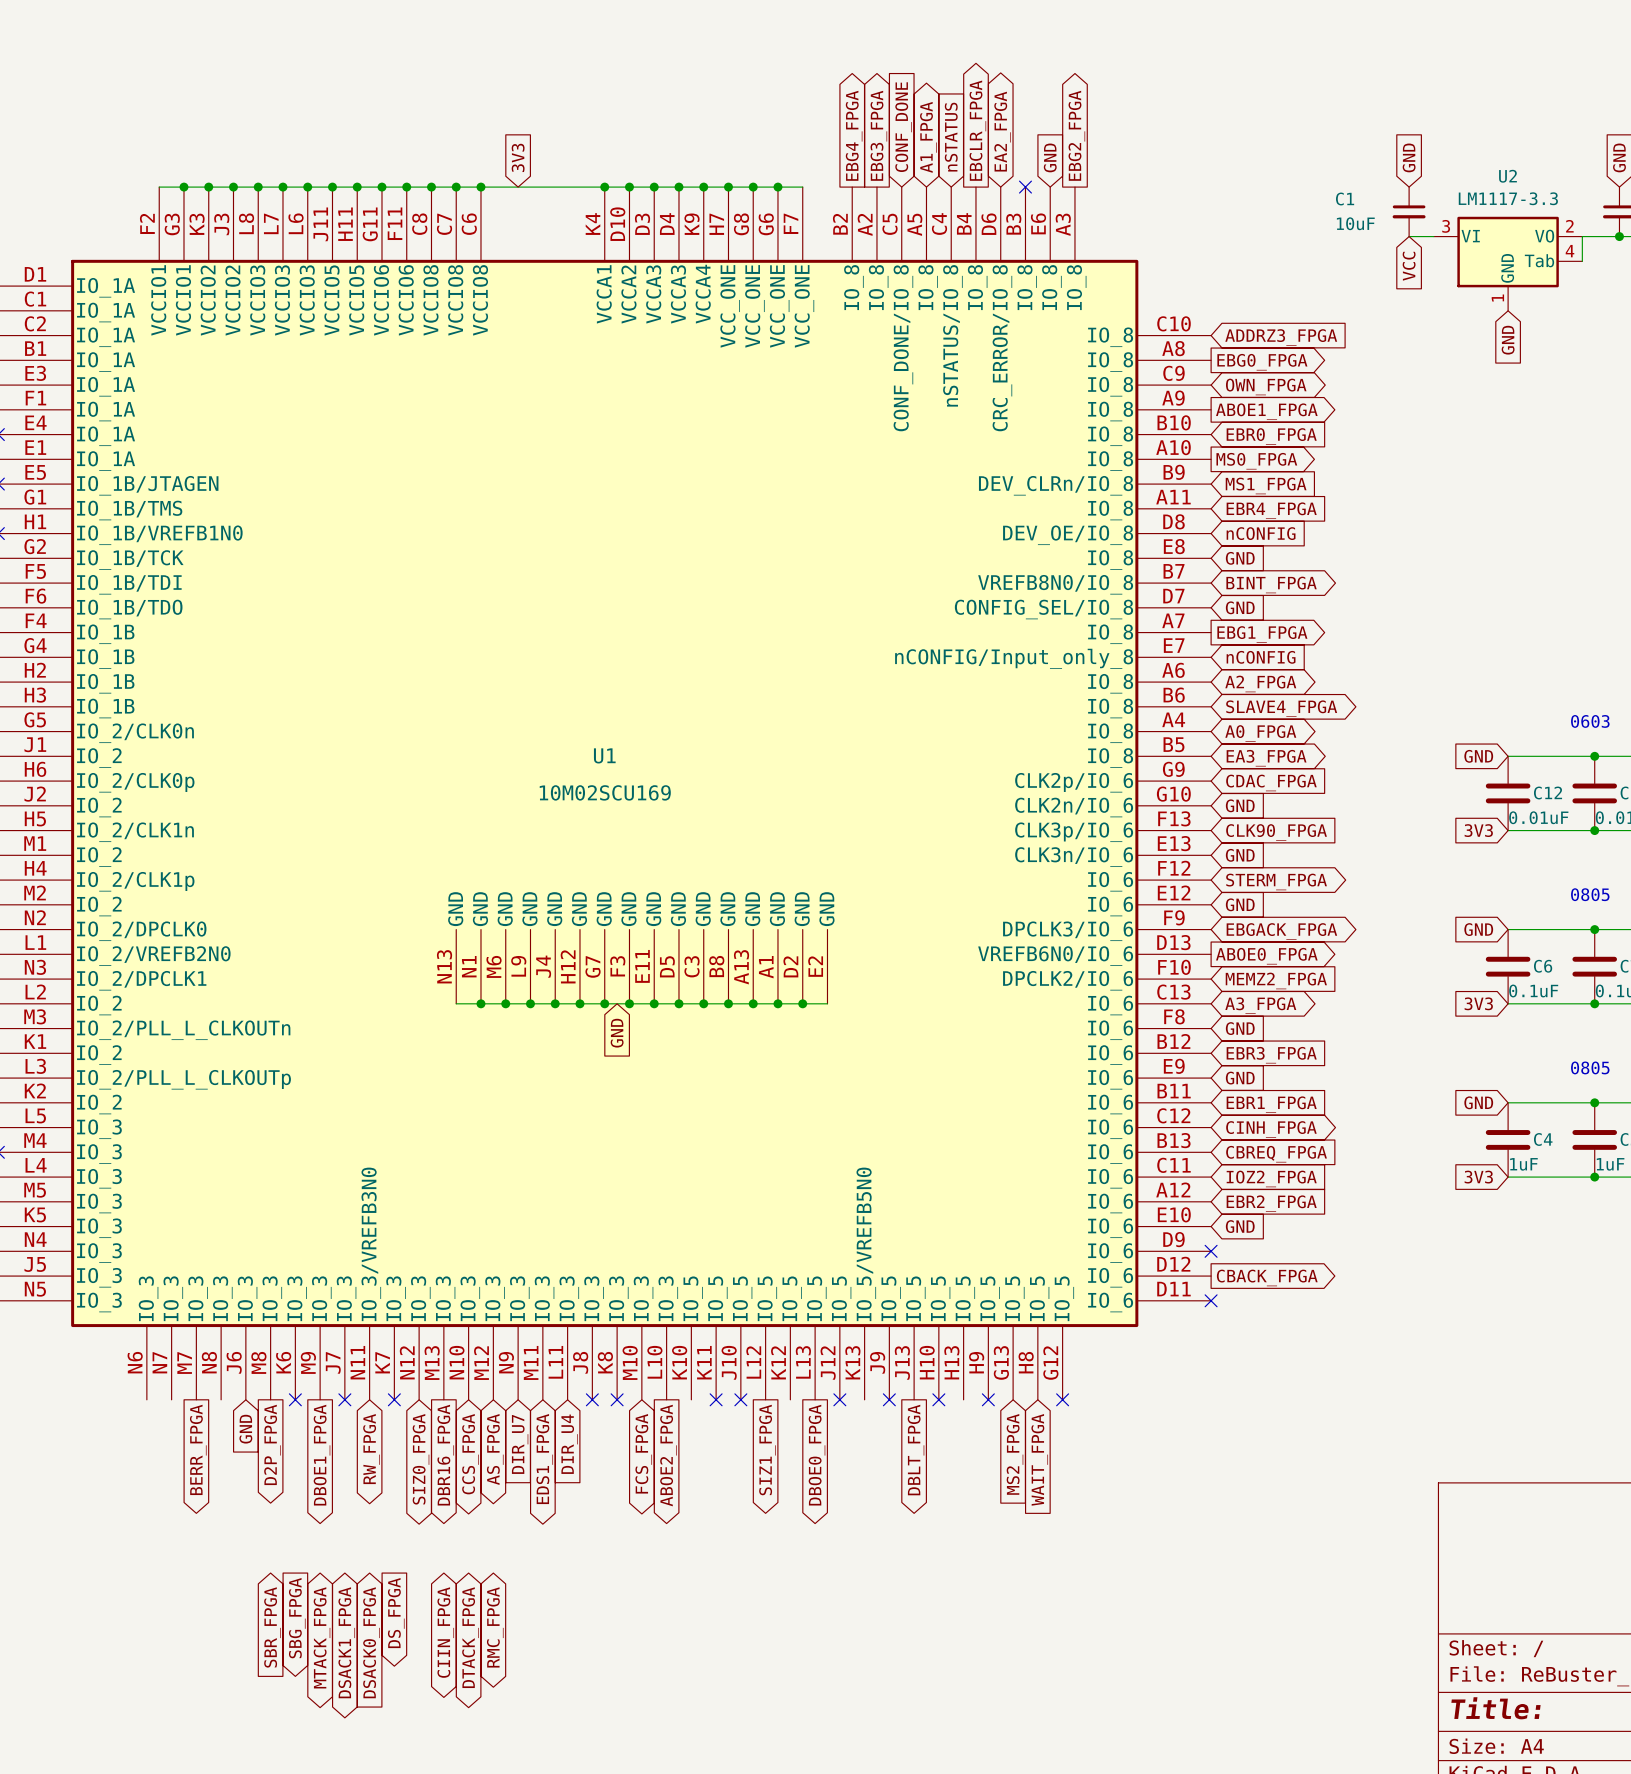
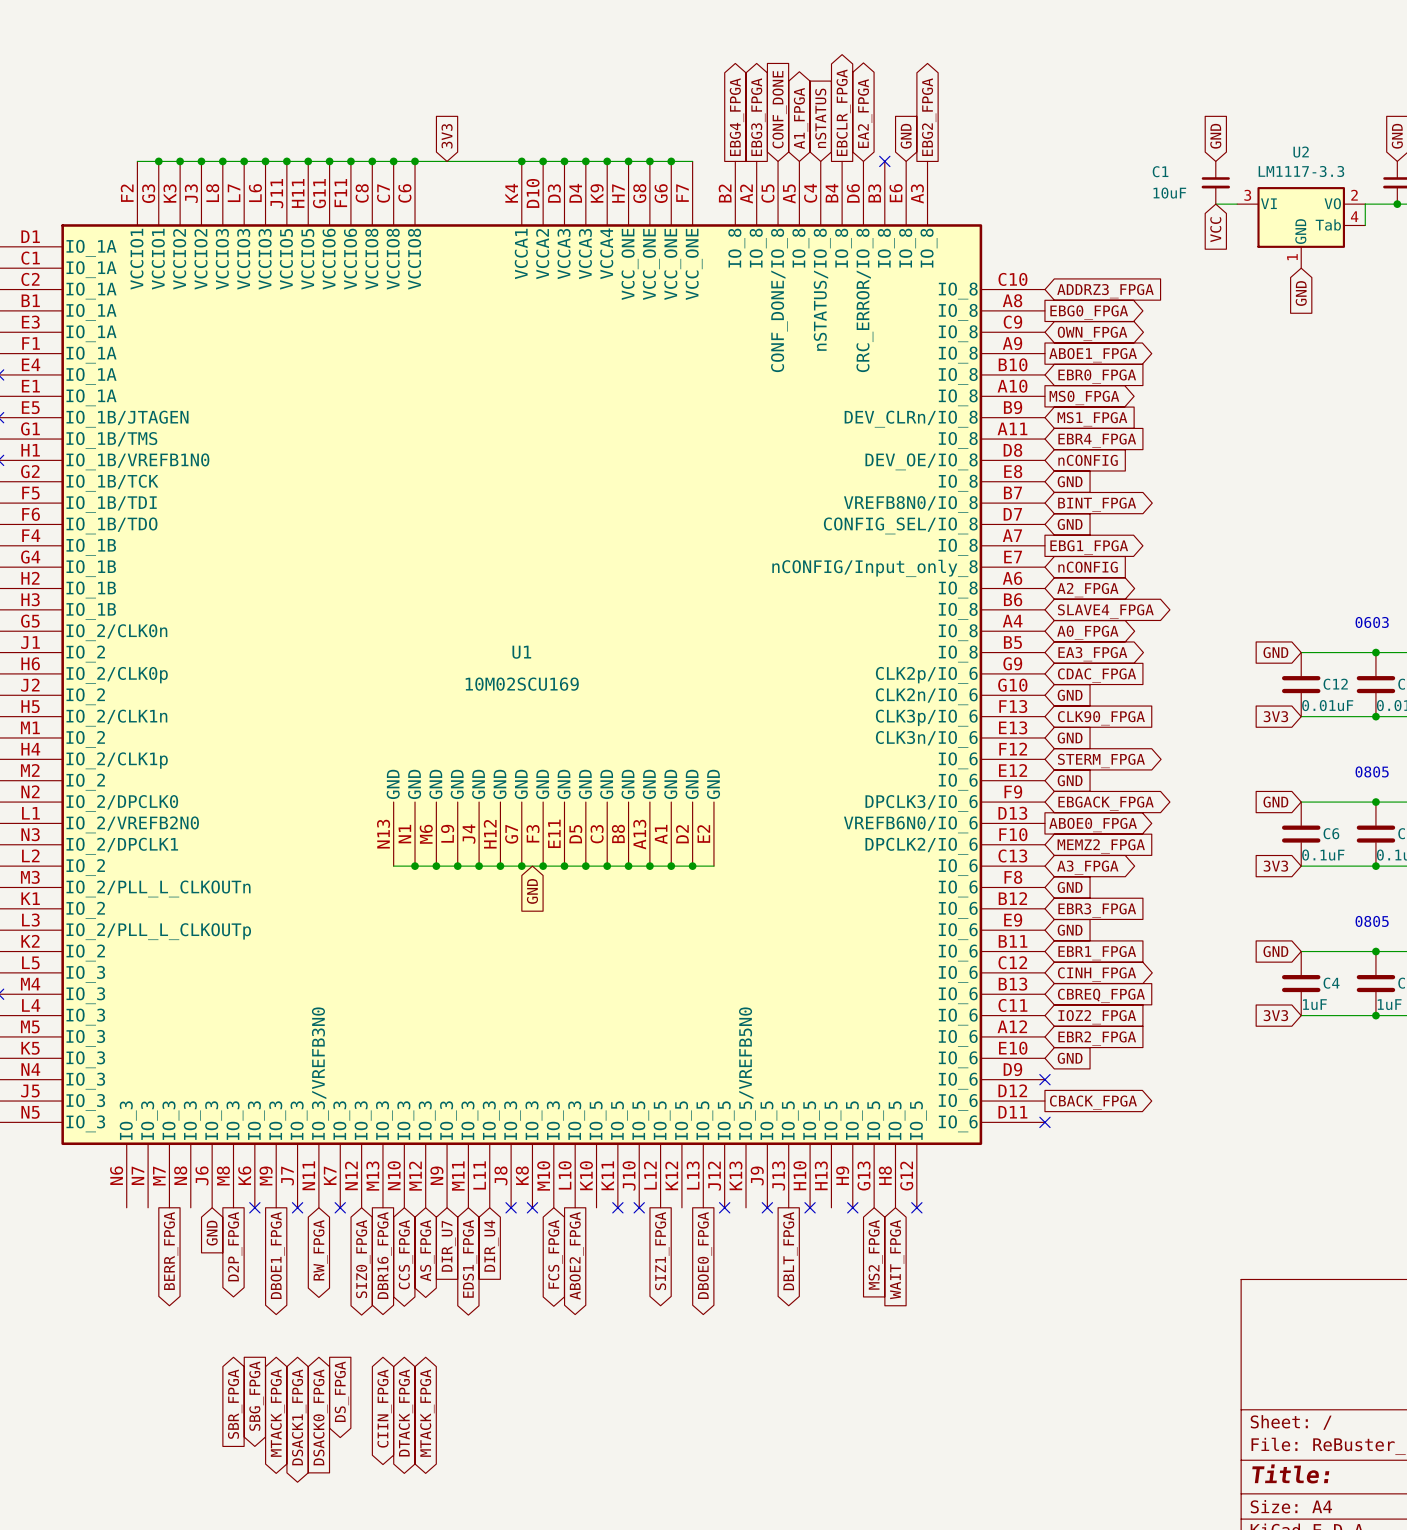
global label: RMC_FPGA (495, 1627) -> MTACK_FPGA (427, 1413)

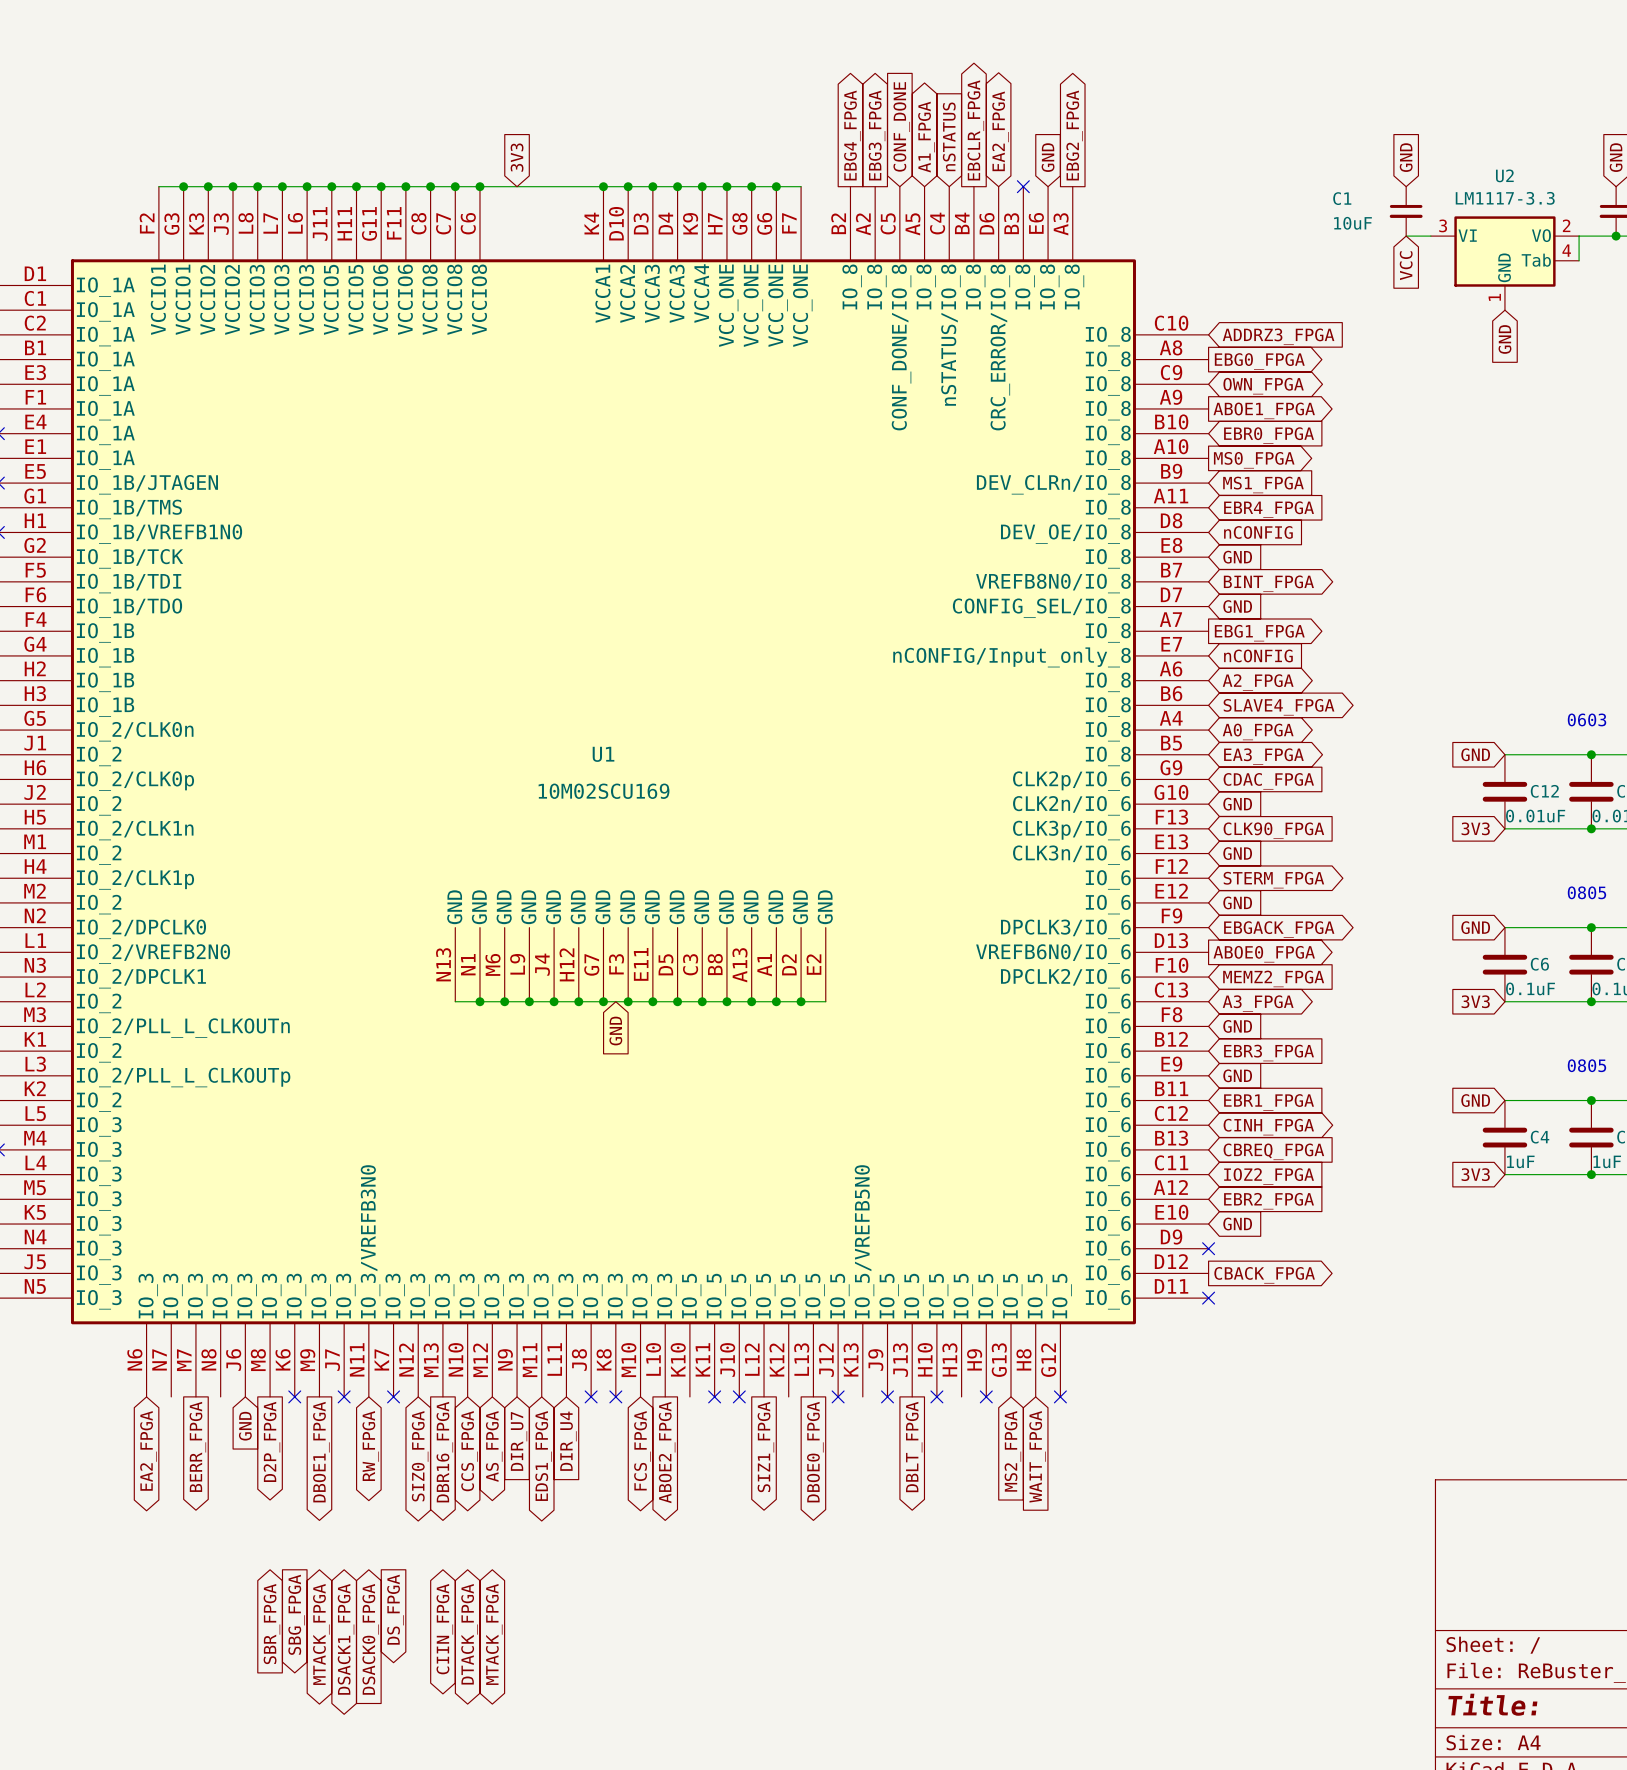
global label: none -> EA2_FPGA (148, 1450)

